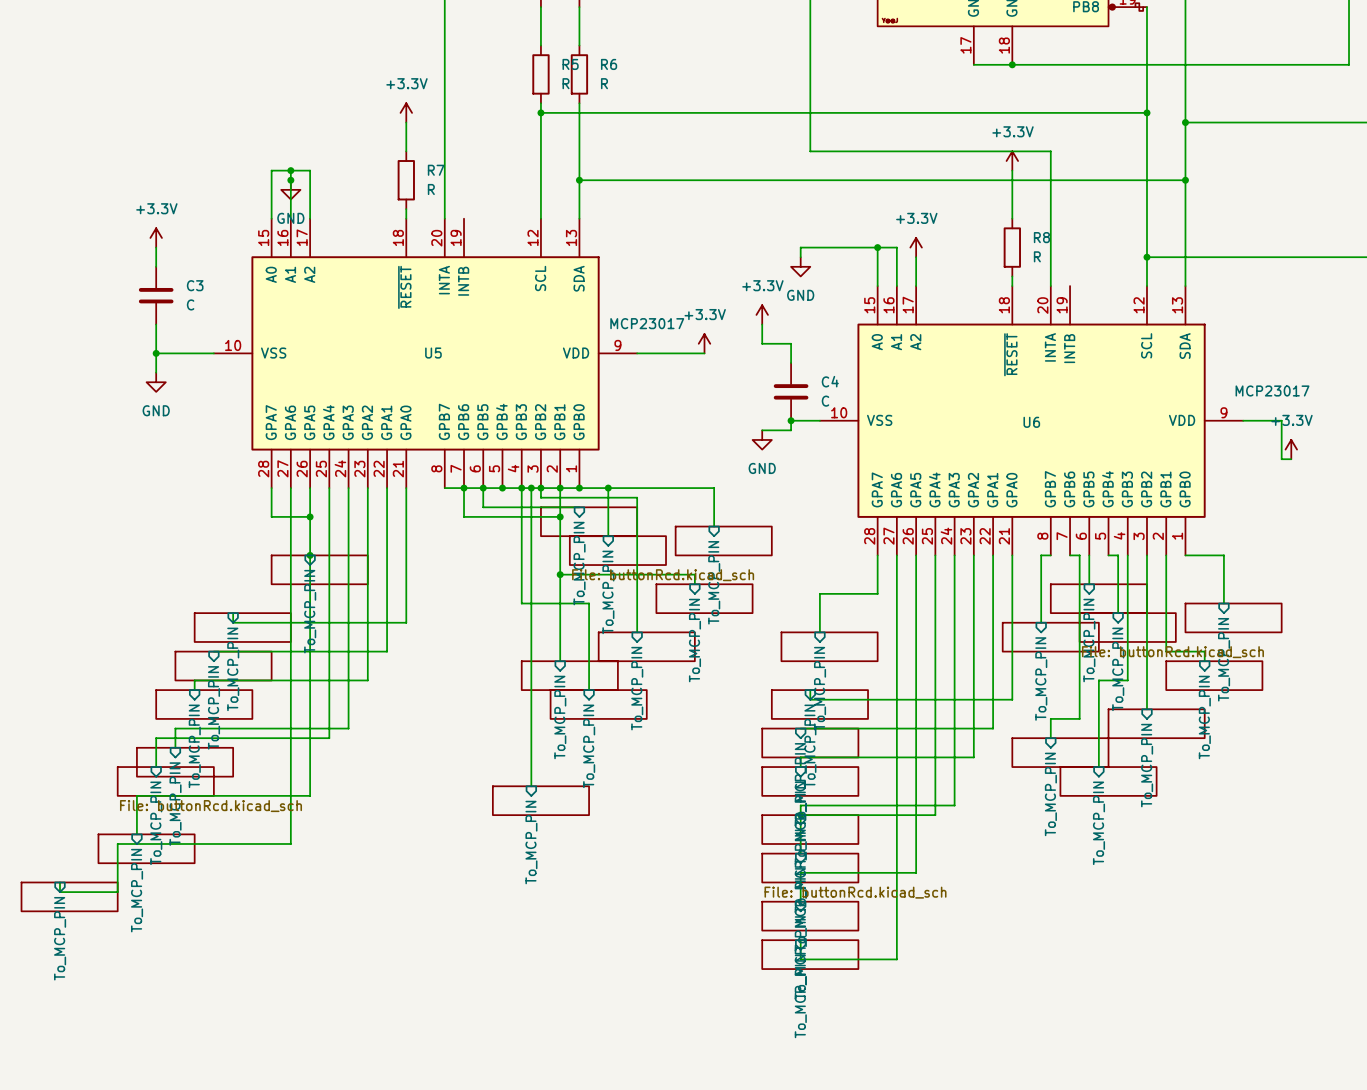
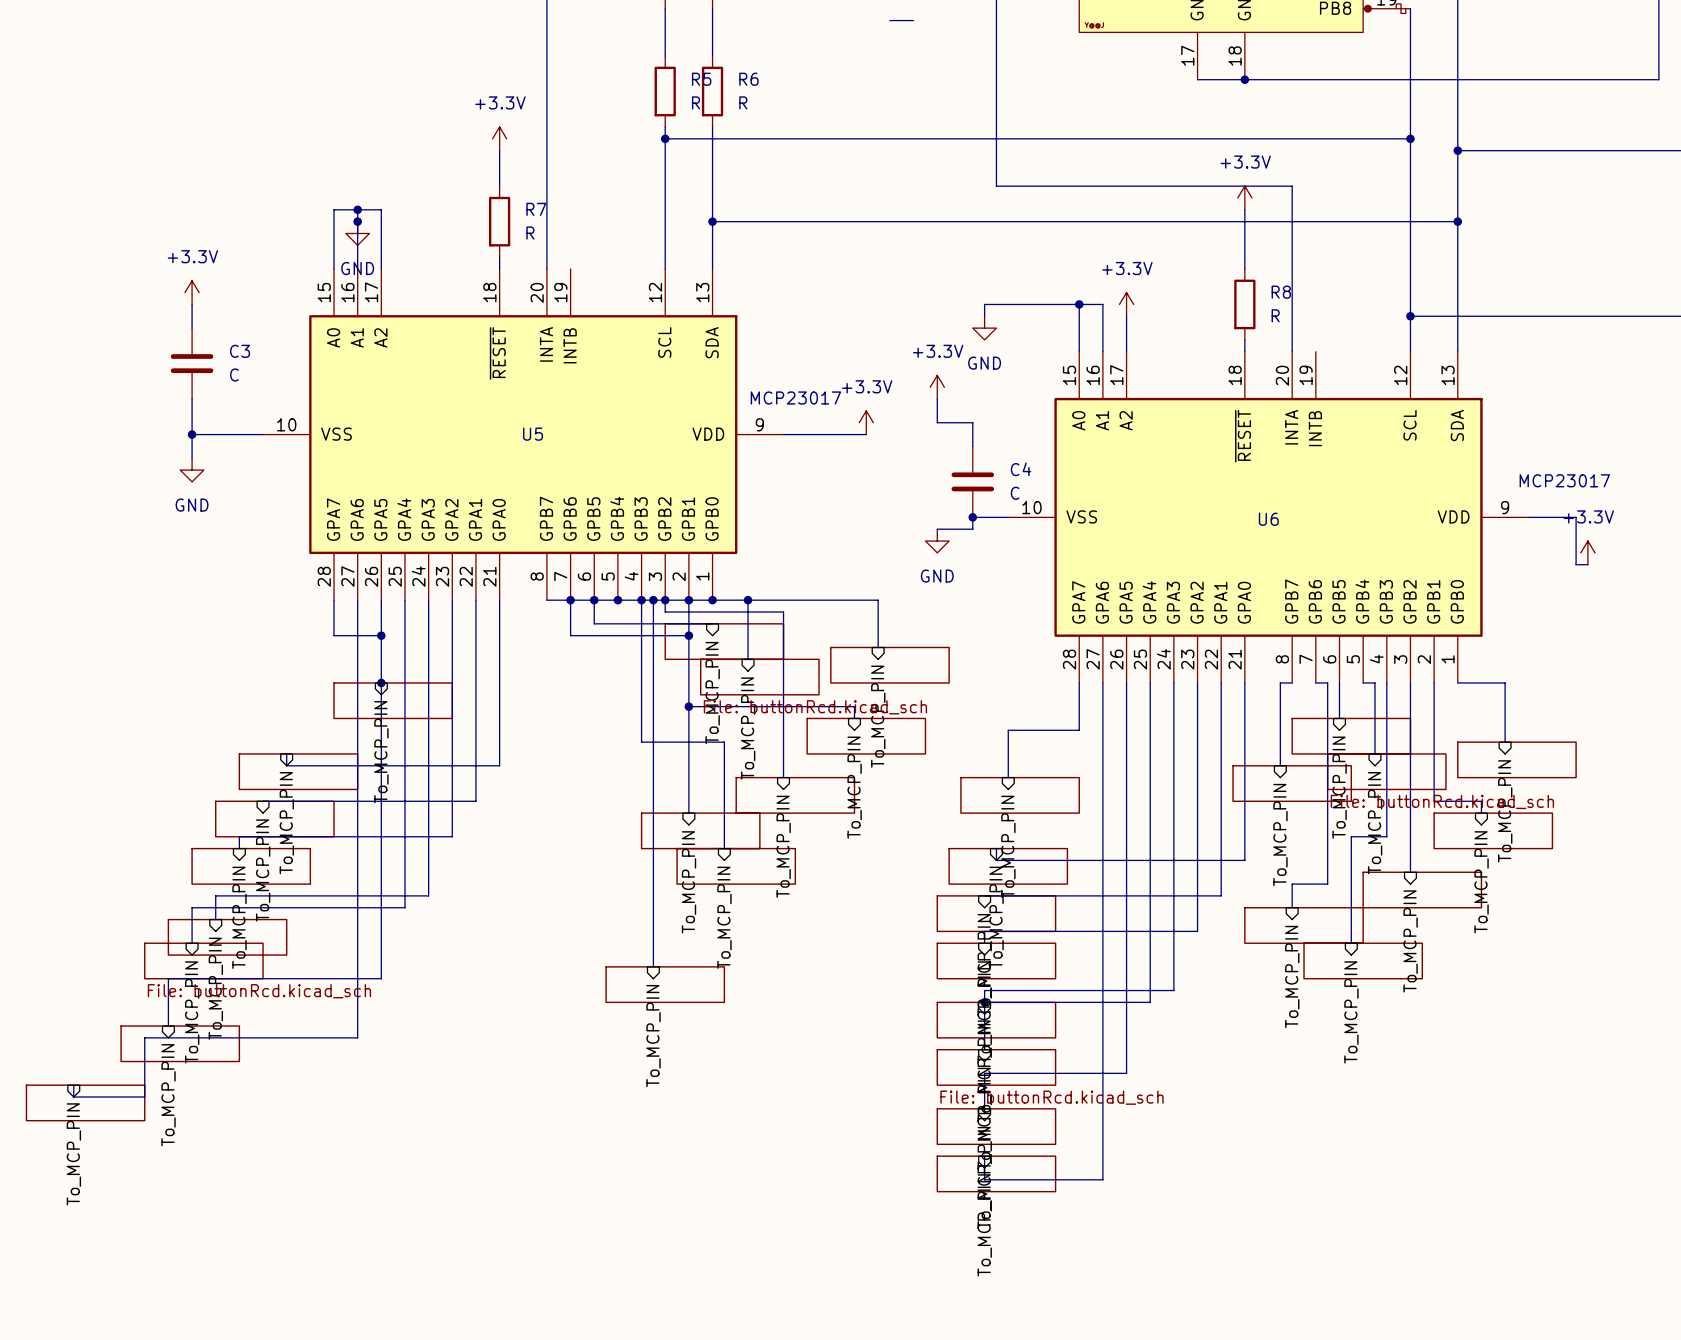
wire: none -> (889, 20) (913, 20)

